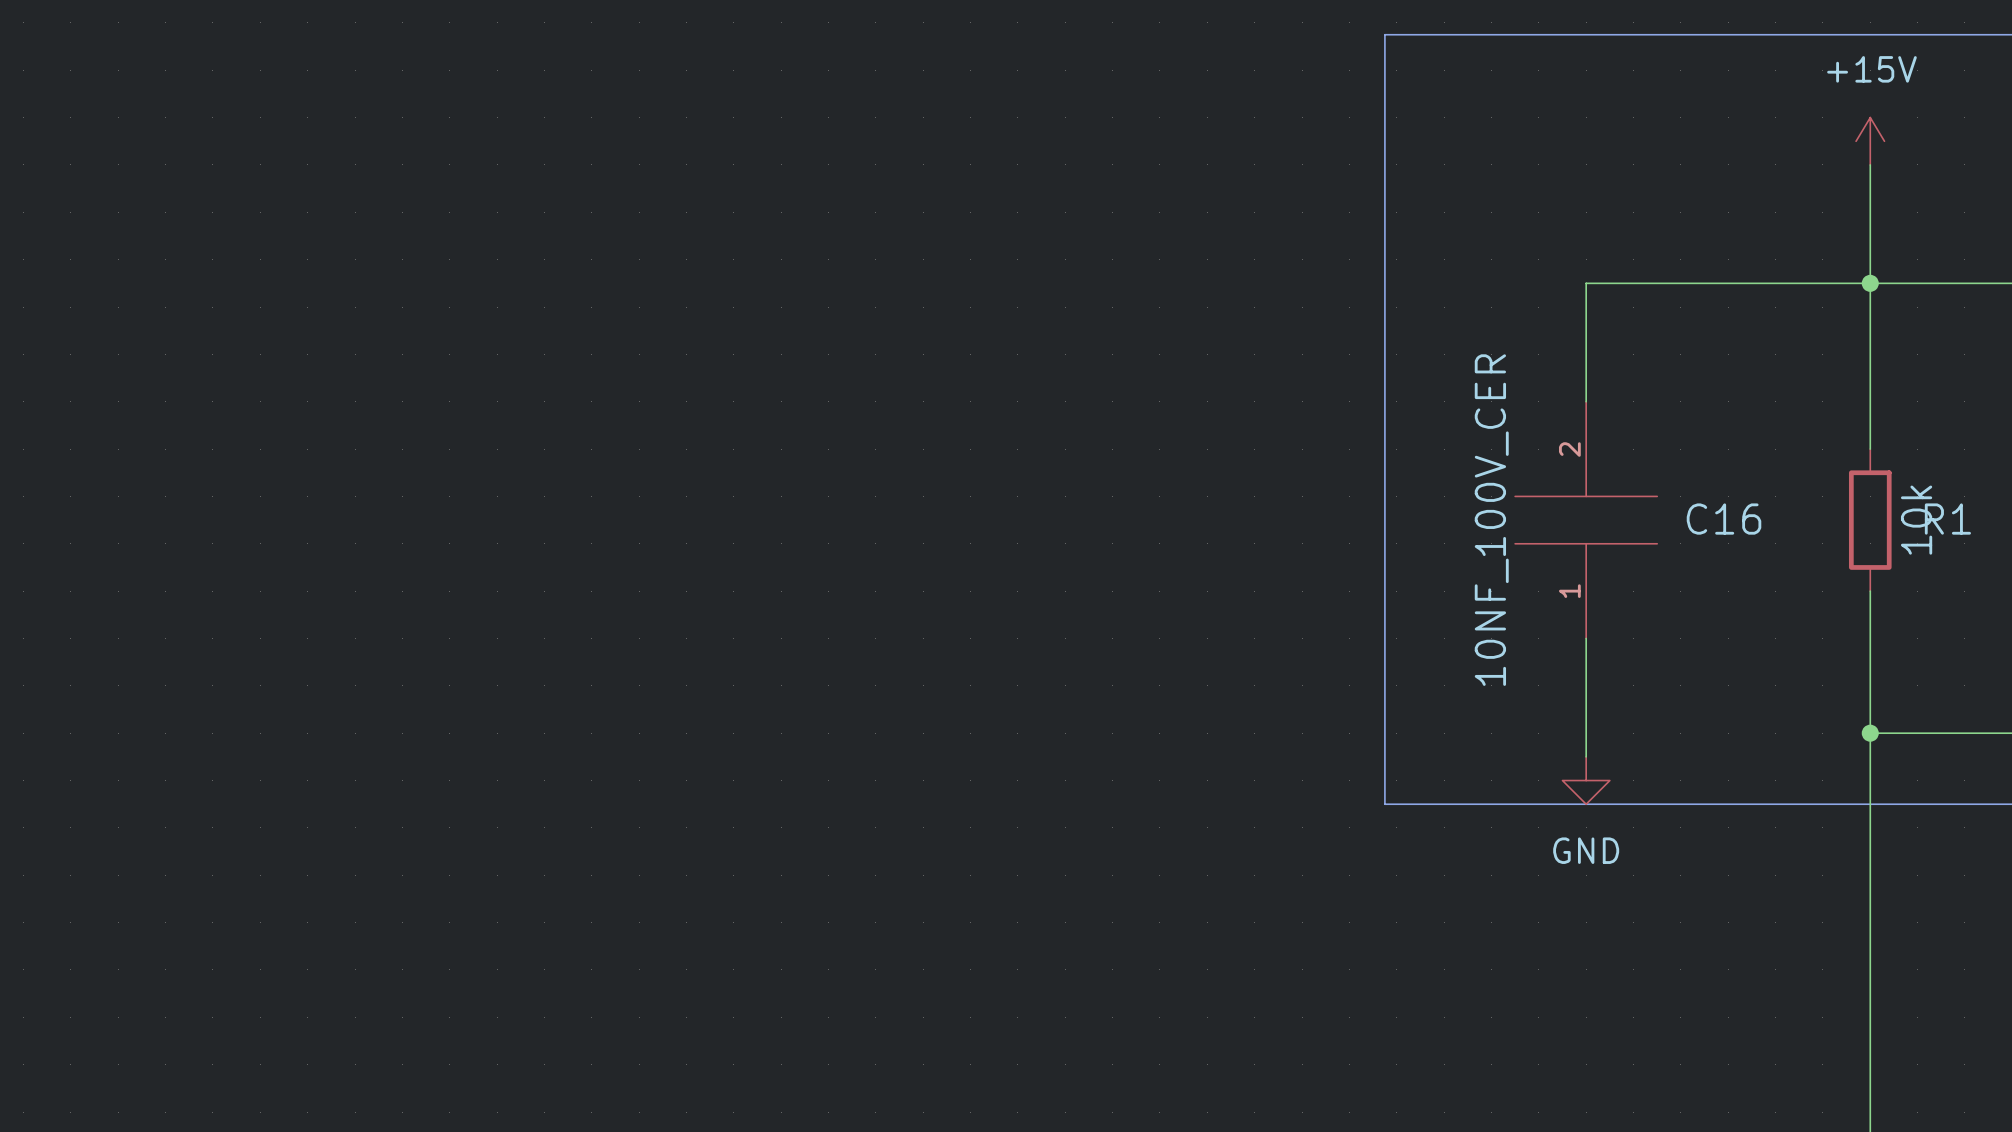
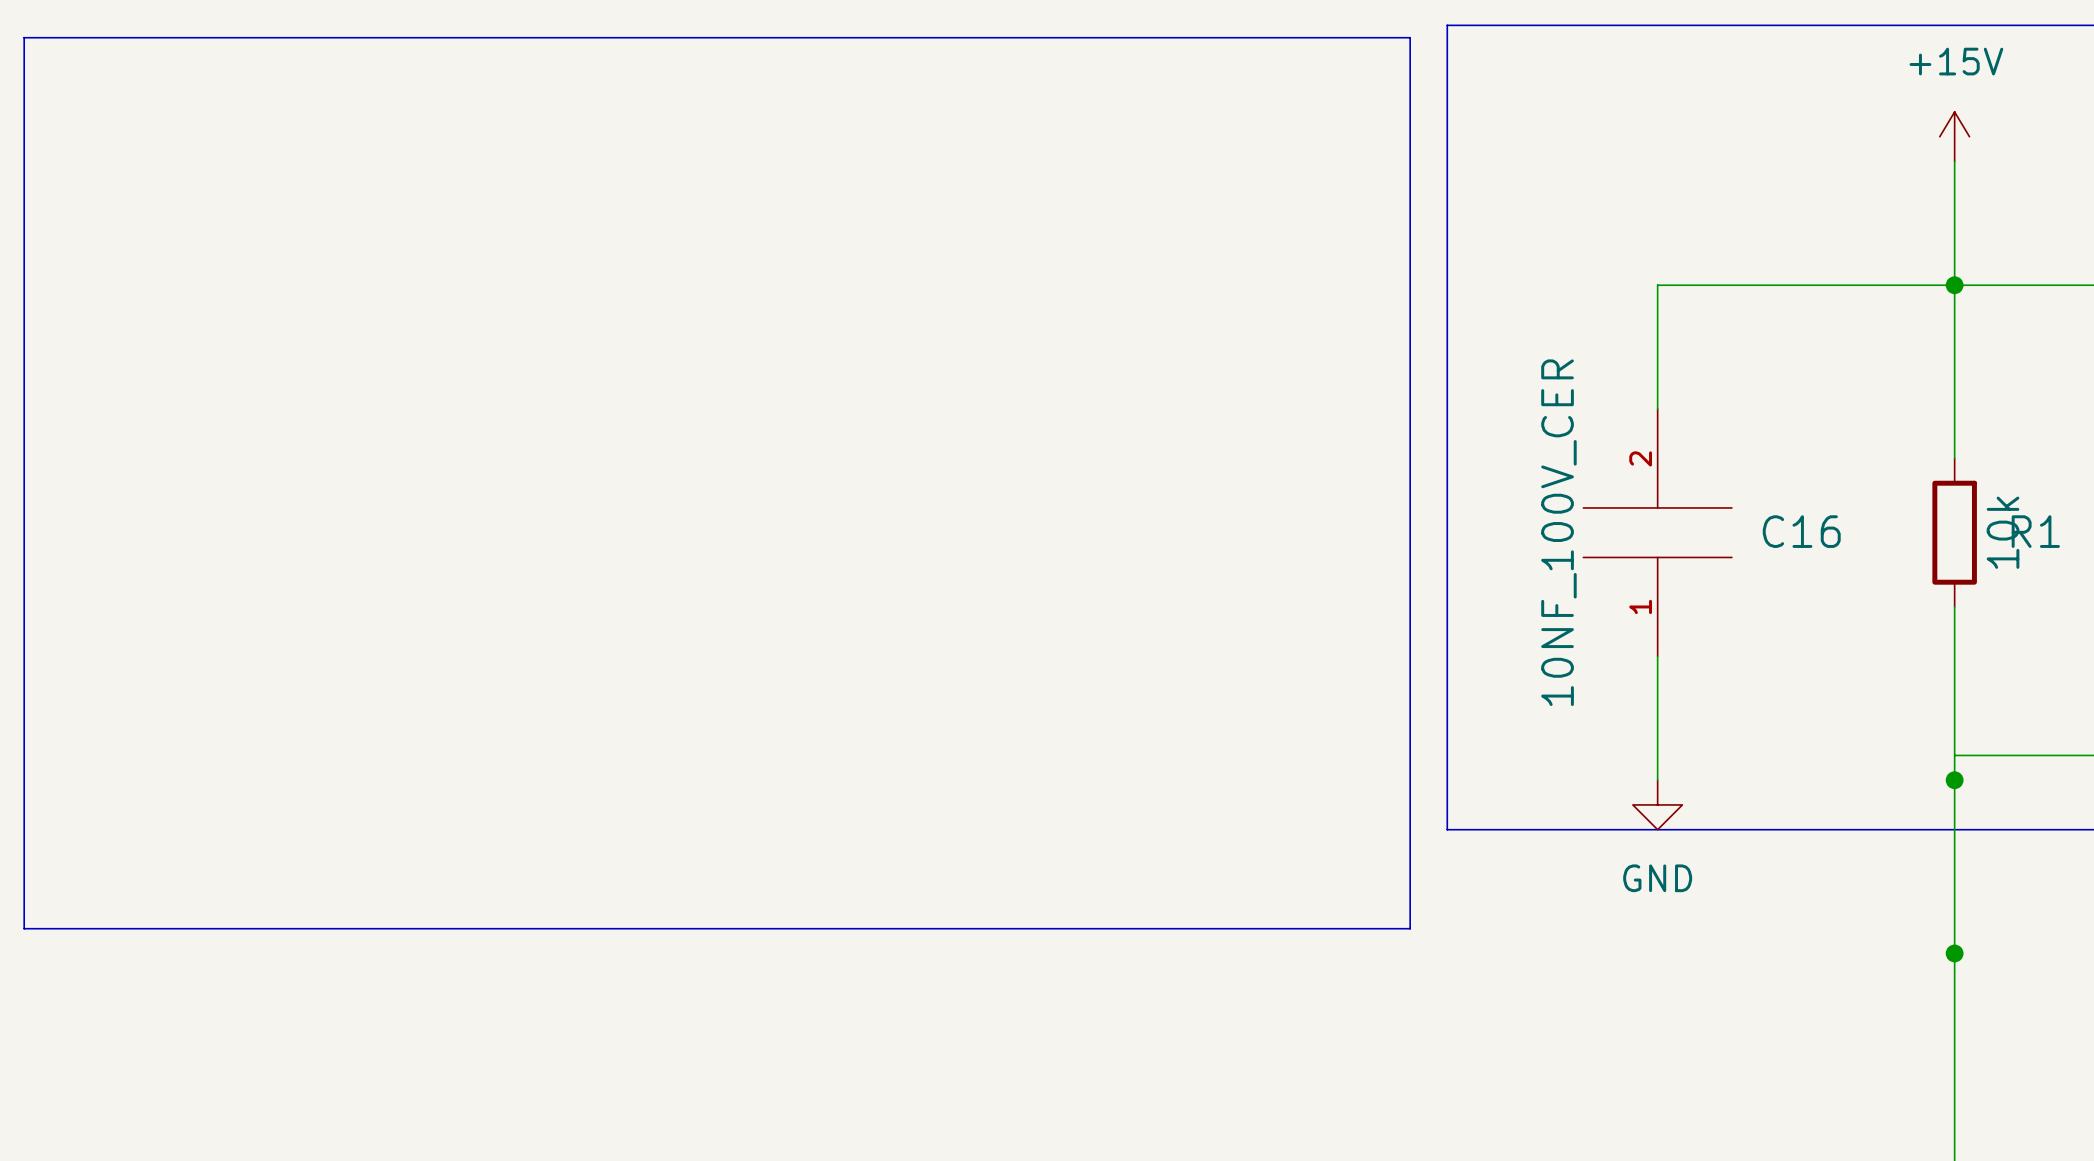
line: none -> (24, 37) (1410, 37) (1410, 928) (24, 928) (24, 37)
junction position: (1870, 733) -> (1954, 780)
junction: none -> (1954, 953)

